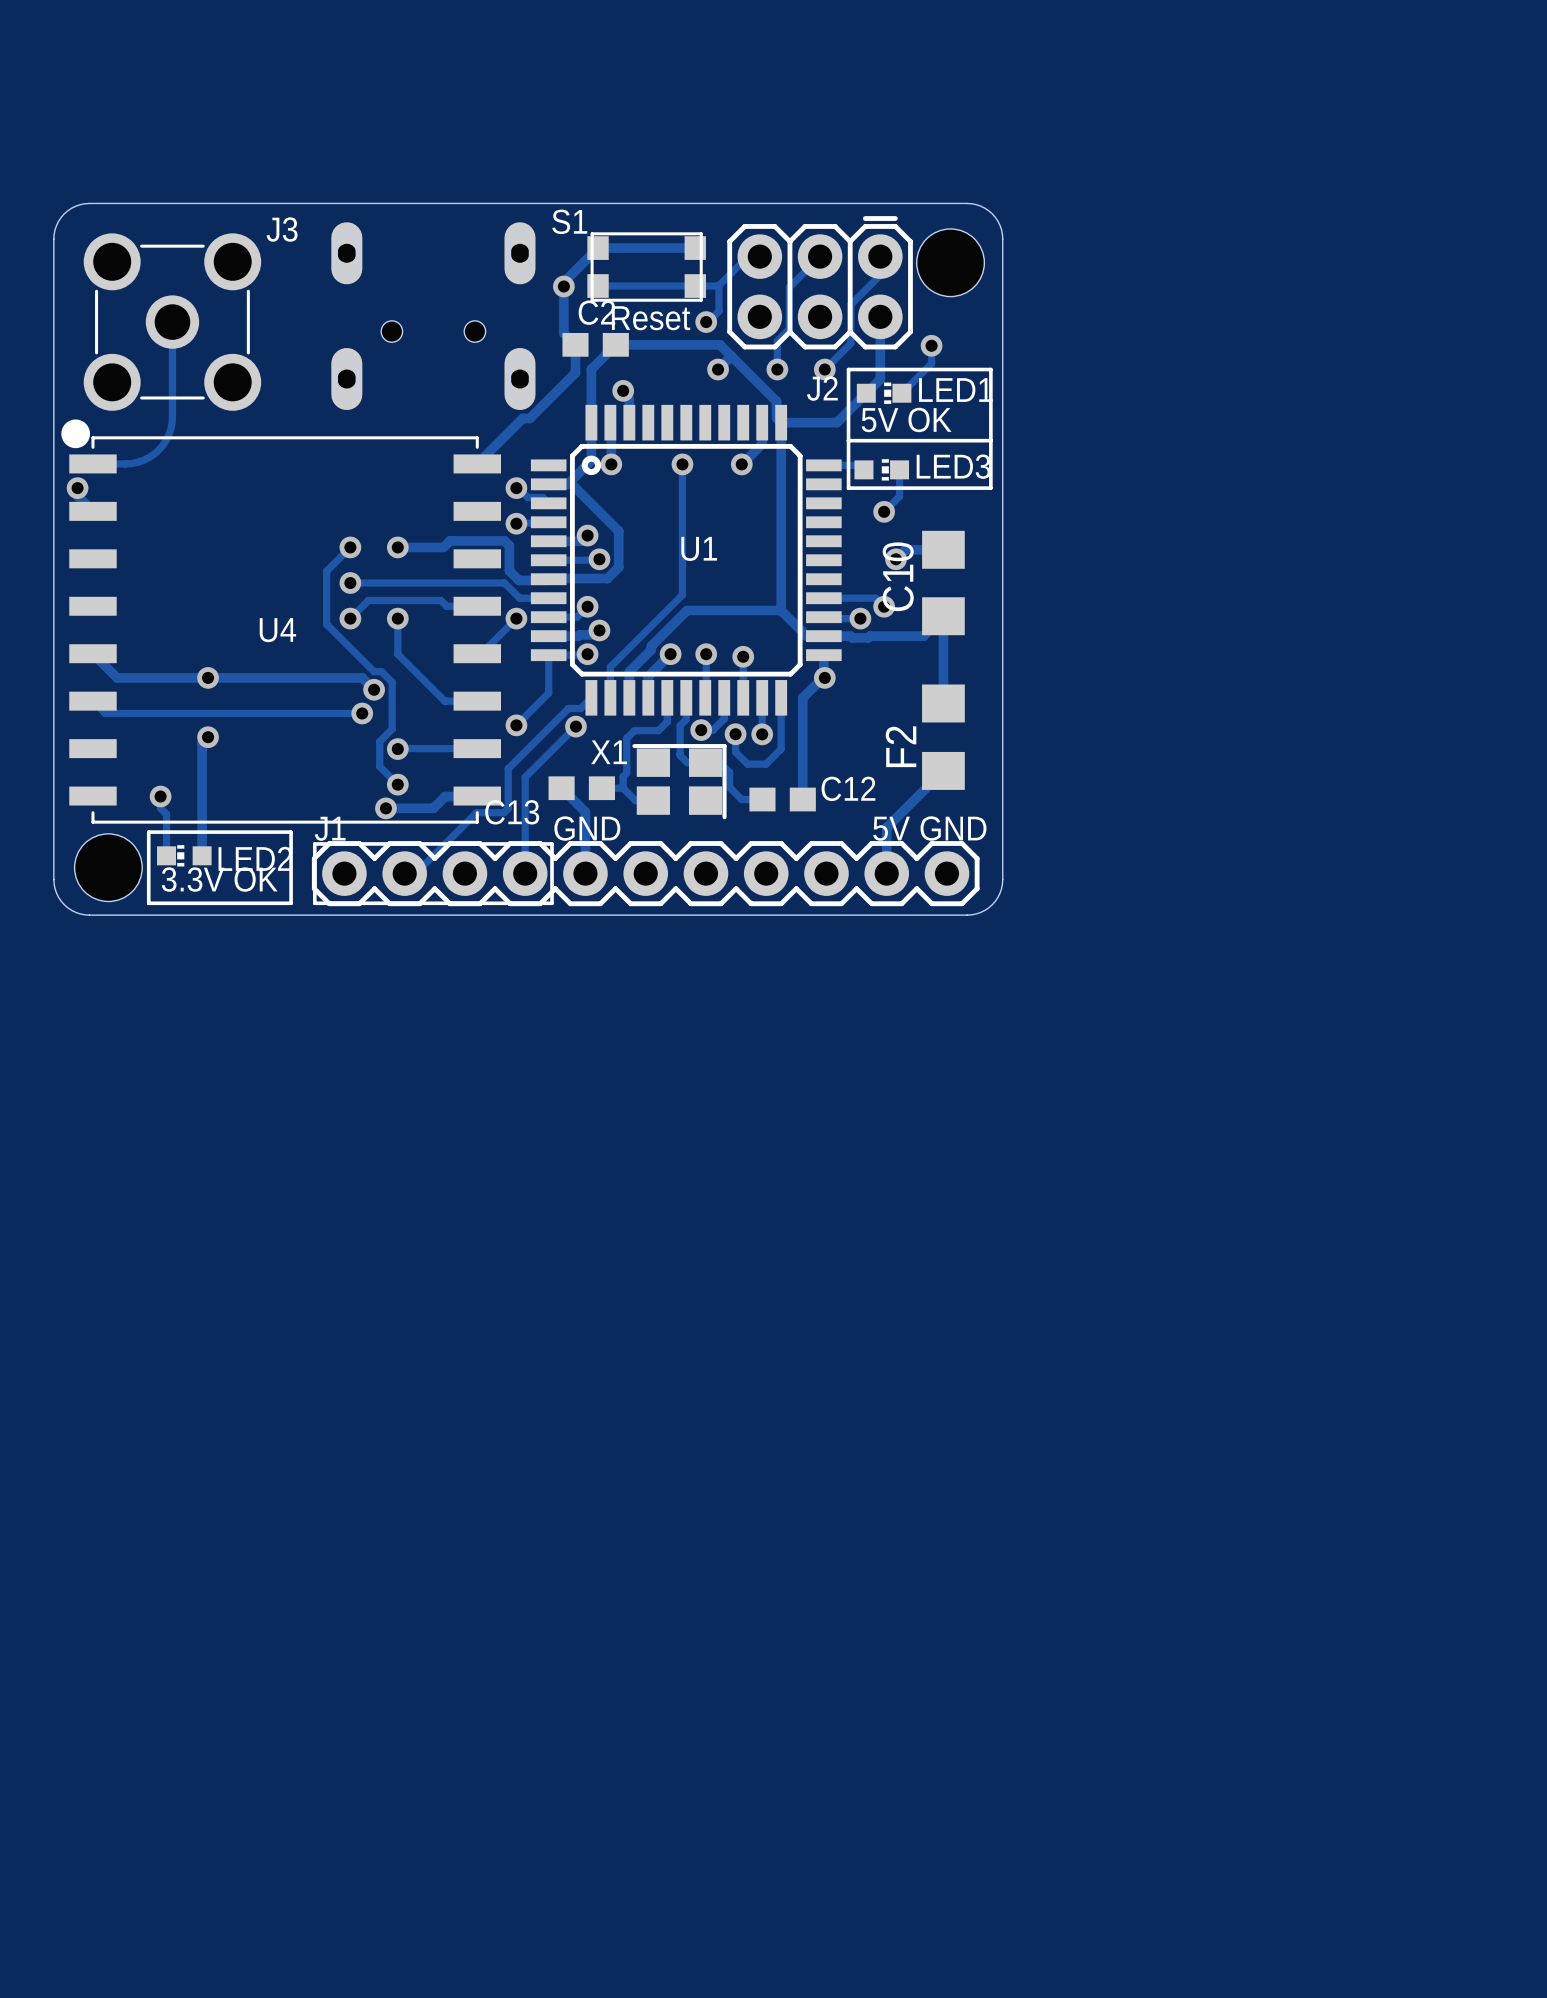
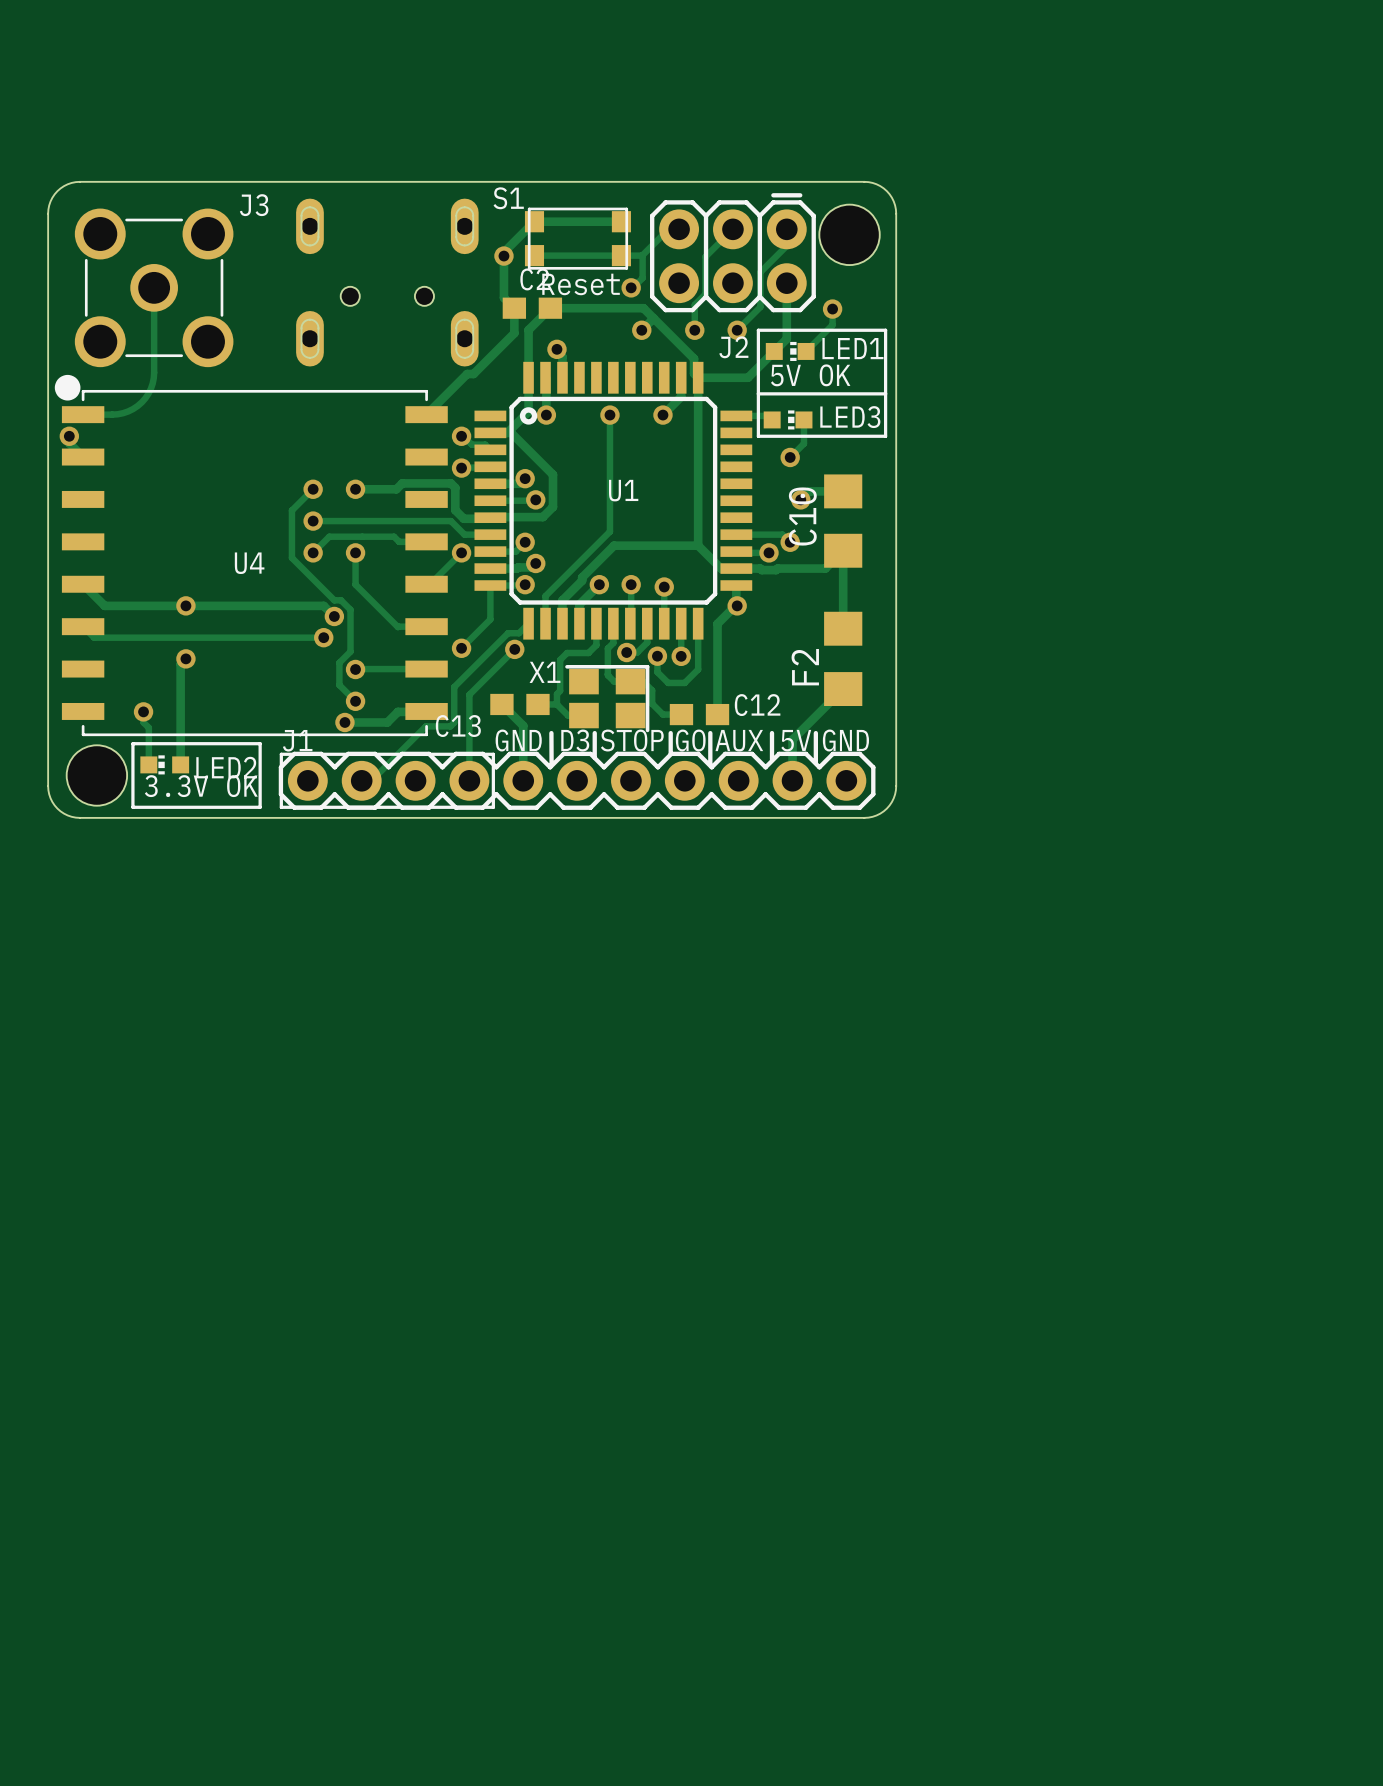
line: none -> (551, 733) (551, 763)
line: none -> (594, 733) (594, 757)
line: none -> (670, 733) (670, 753)
line: none -> (710, 733) (710, 763)
line: none -> (772, 733) (772, 759)
line: none -> (815, 733) (815, 762)
text: none -> D3 (575, 740)
text: none -> STOP (632, 740)
text: none -> GO (690, 740)
text: none -> AUX (739, 740)

